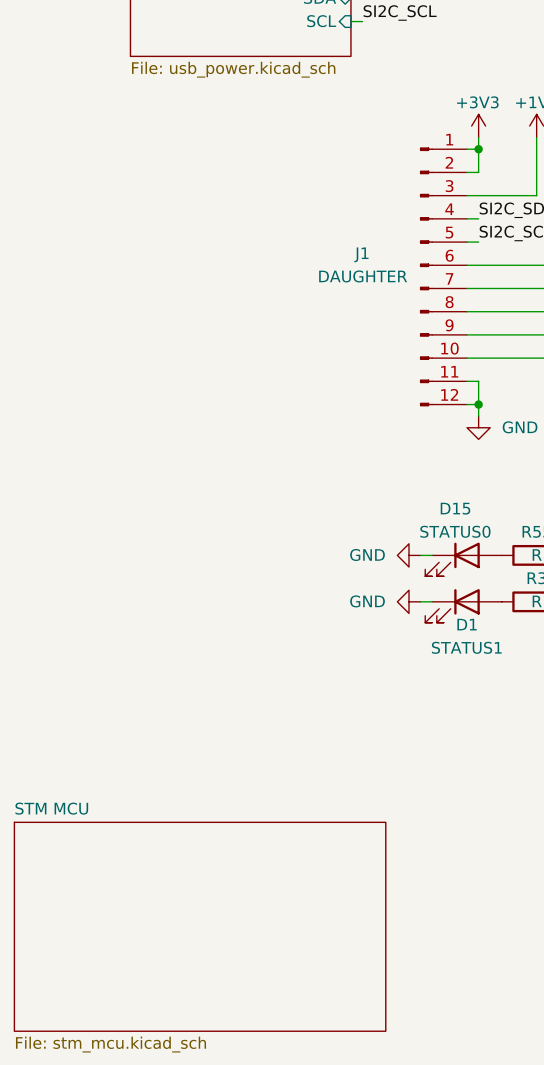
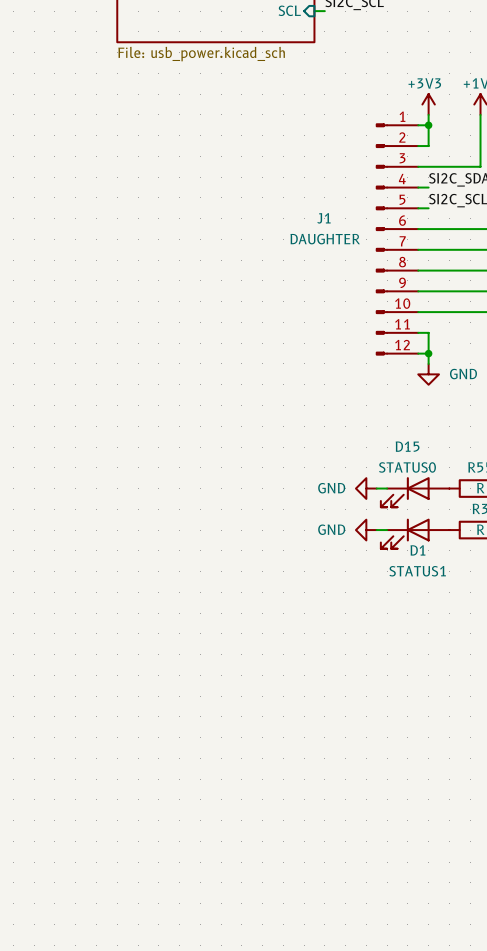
sheet STM MCU: File: stm_mcu.kicad_sch (200, 926) -> none

